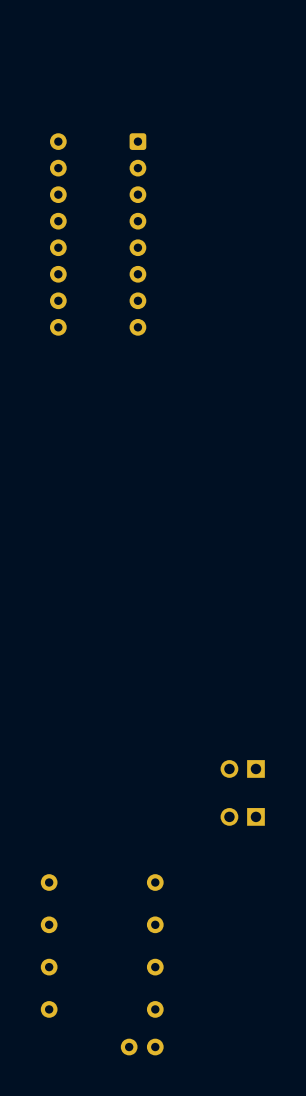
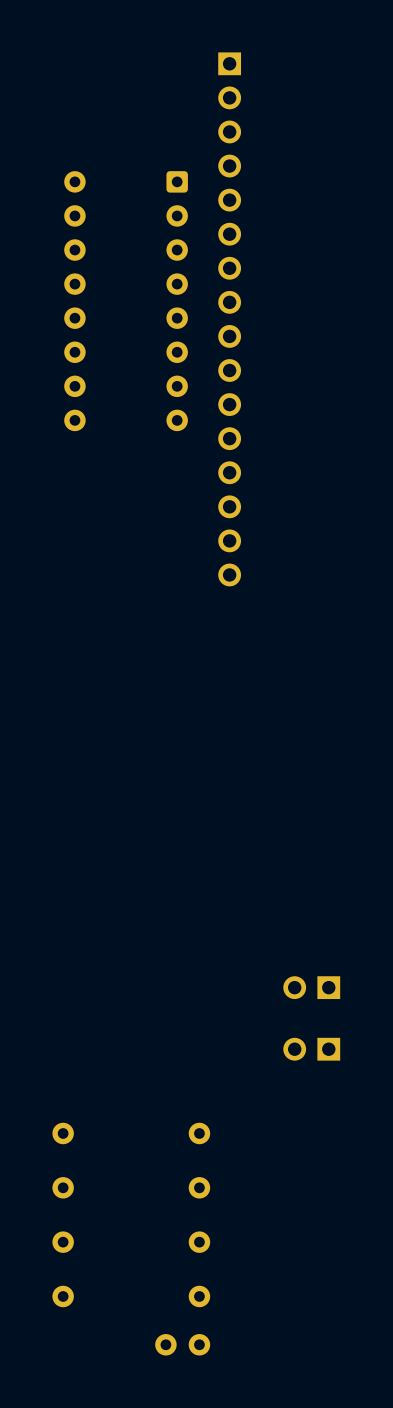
part: none -> (229, 319)

